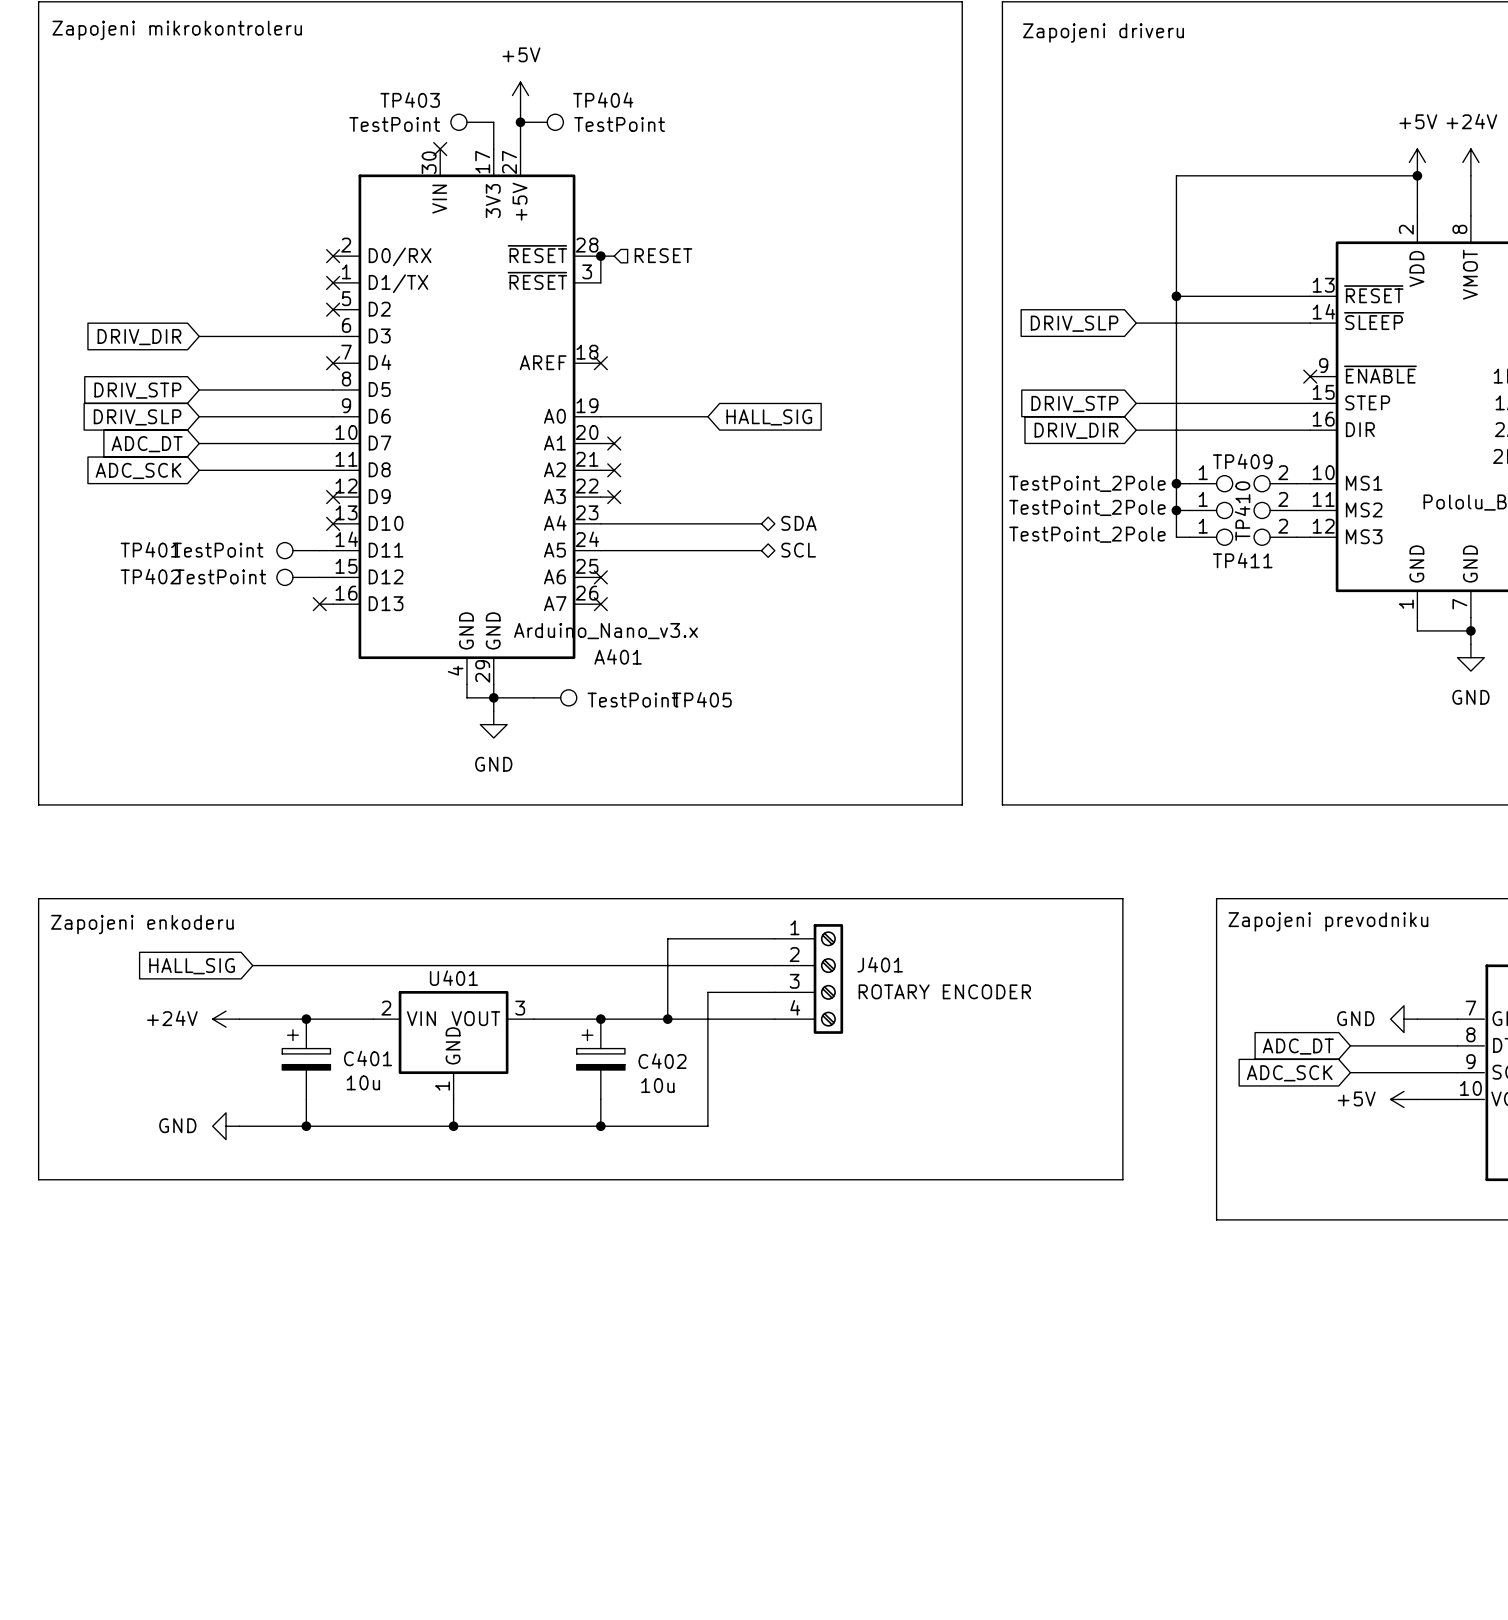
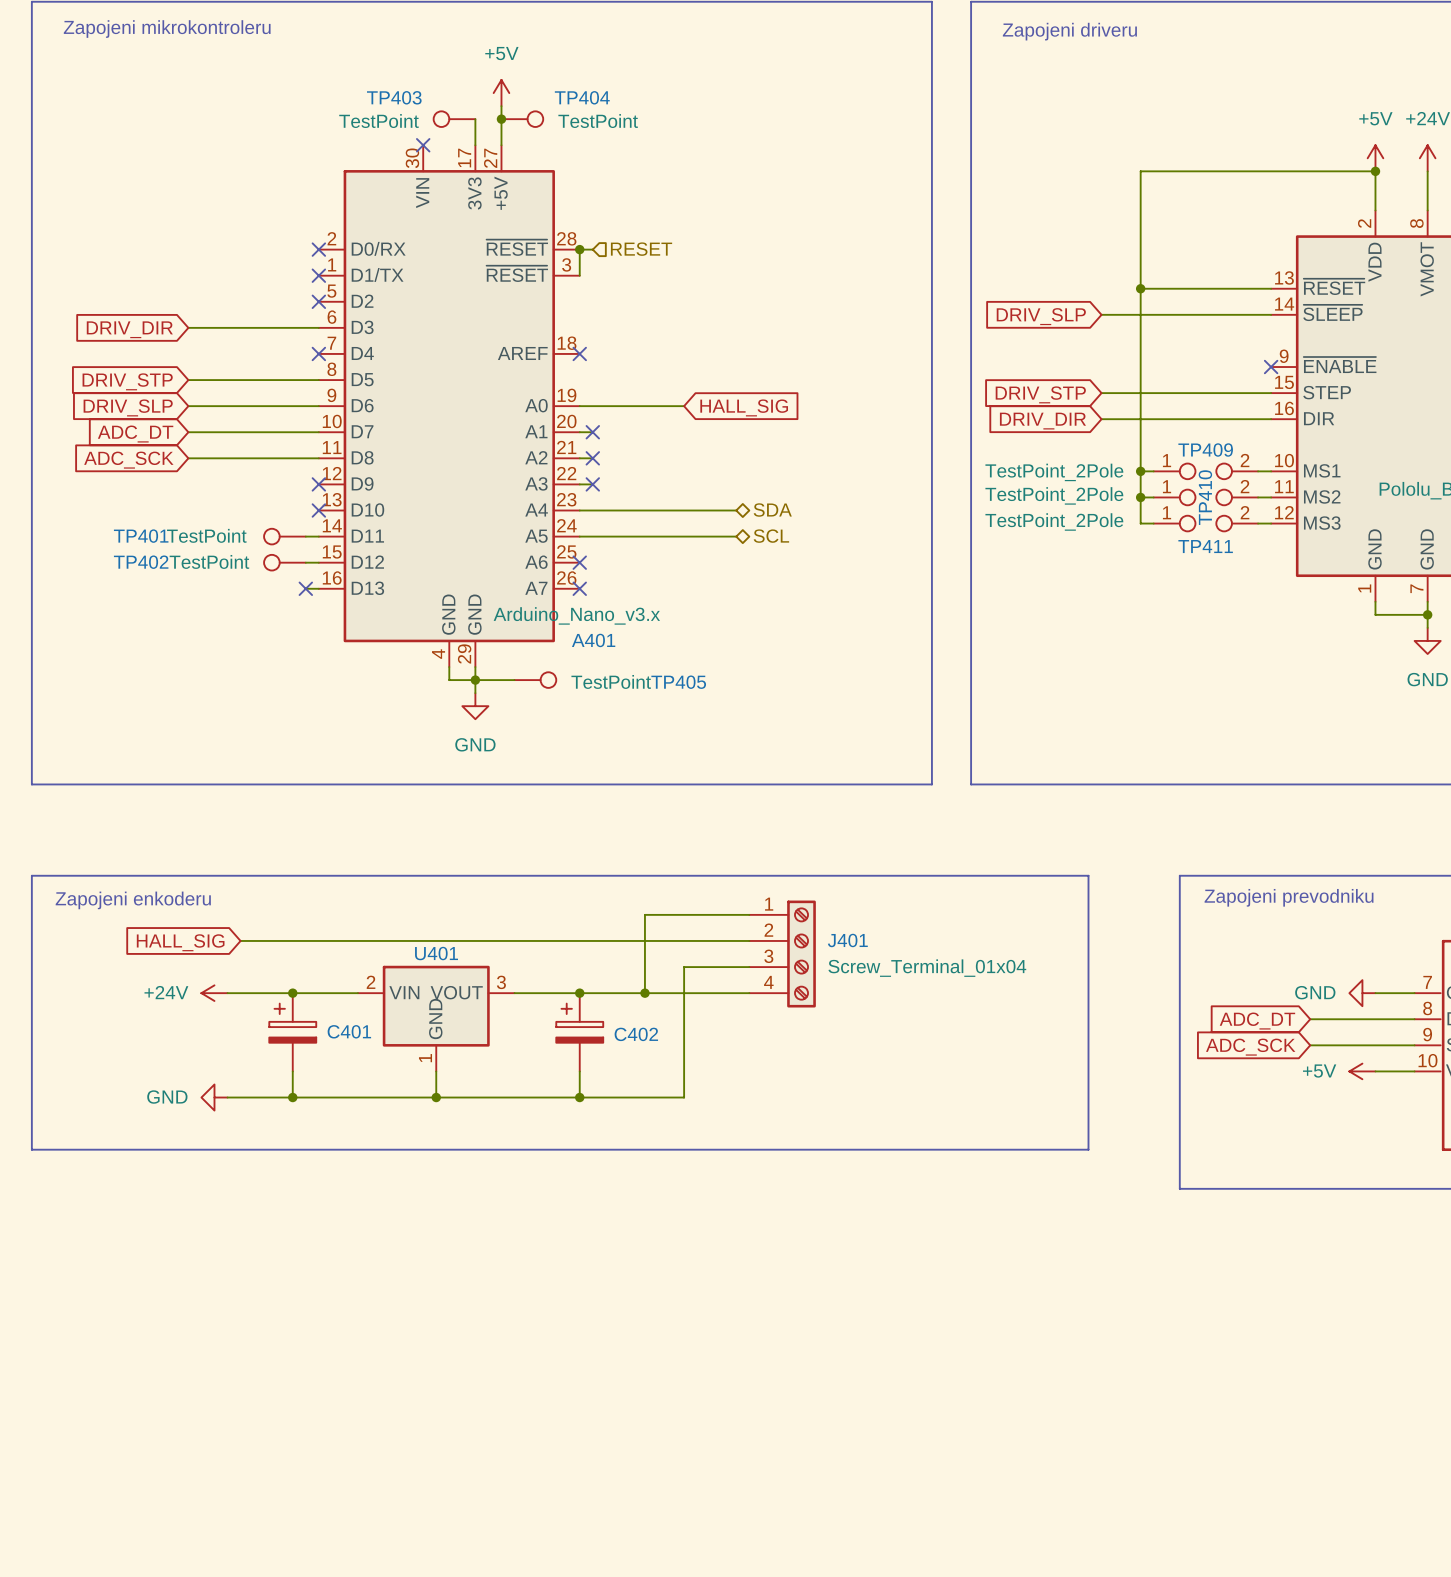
J401 value: ROTARY ENCODER (944, 991) -> Screw_Terminal_01x04 (927, 968)
C401 value: 10u (363, 1082) -> none
C402 value: 10u (657, 1085) -> none

